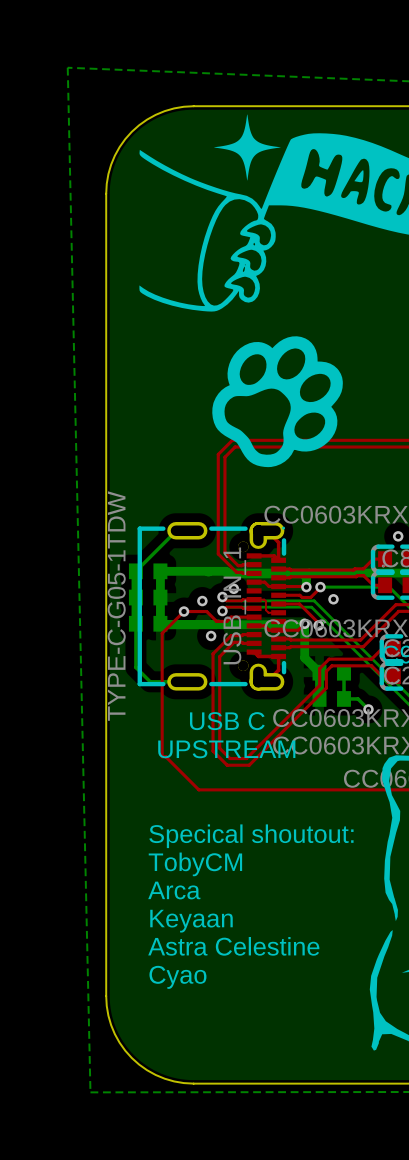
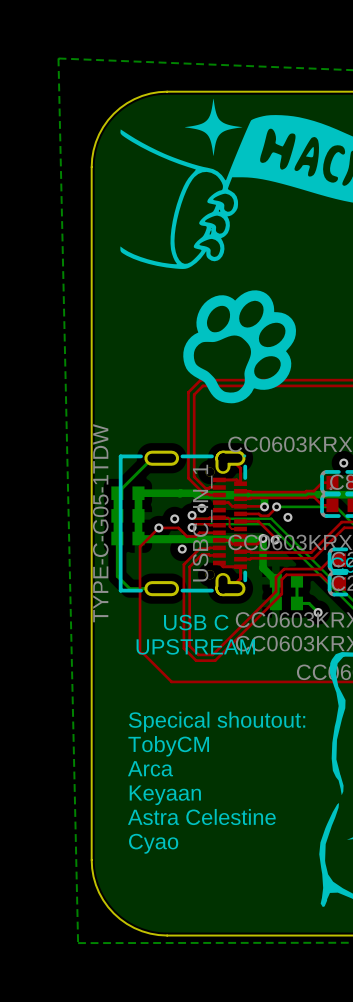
USB_IN_1 name: USB_IN_1 (234, 605) -> USBC_IN_1 (202, 523)

